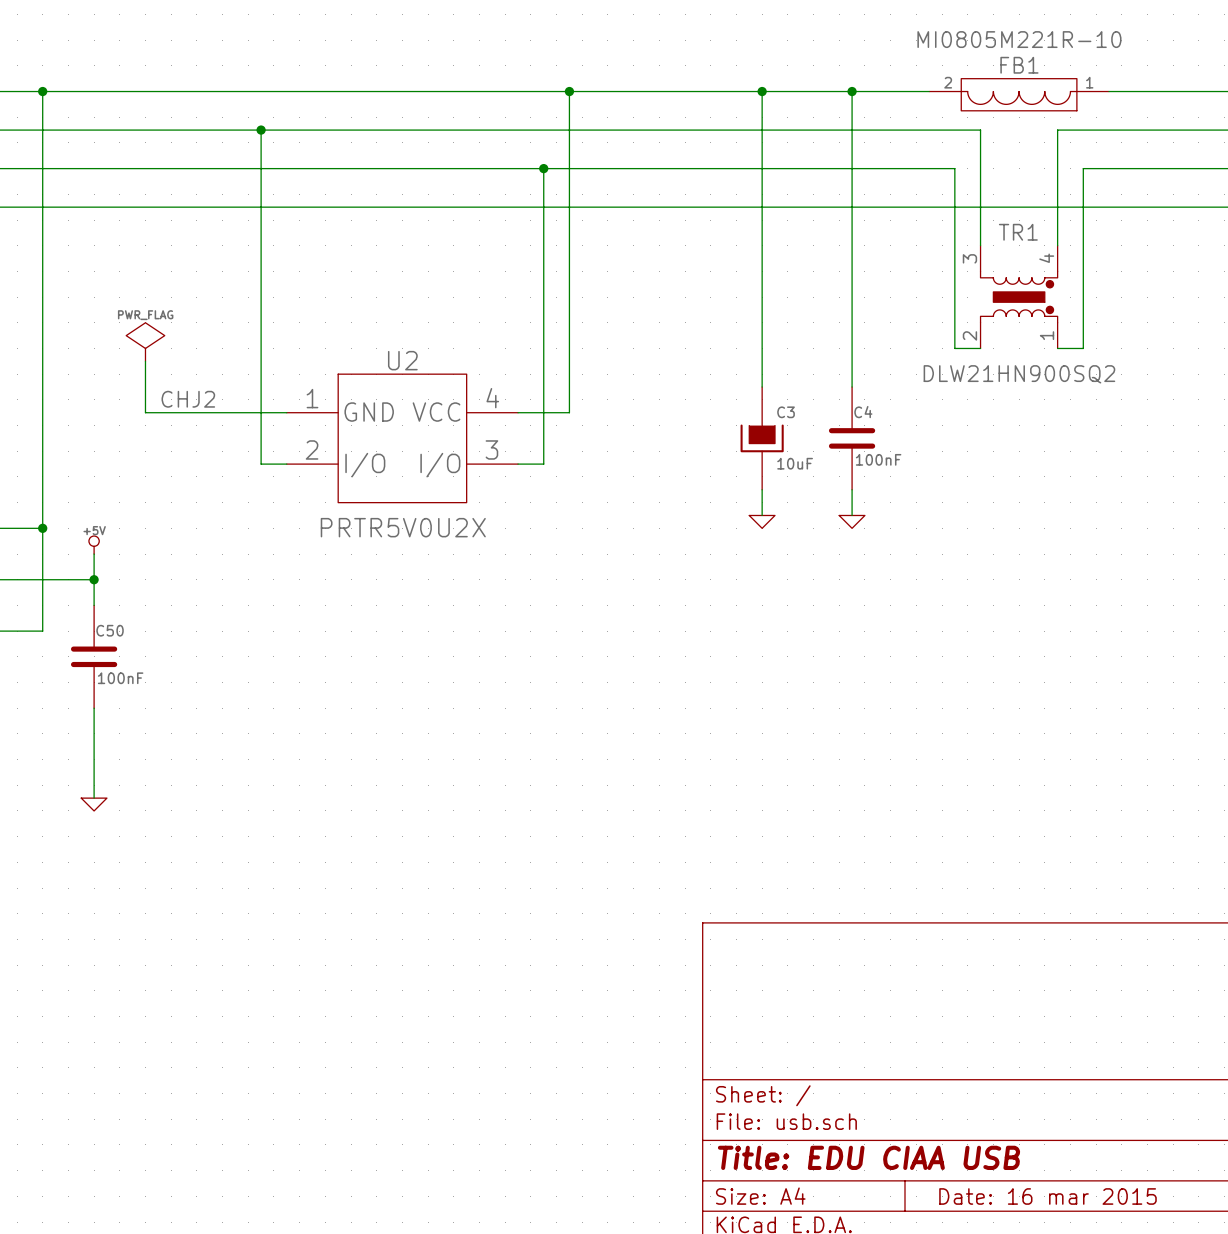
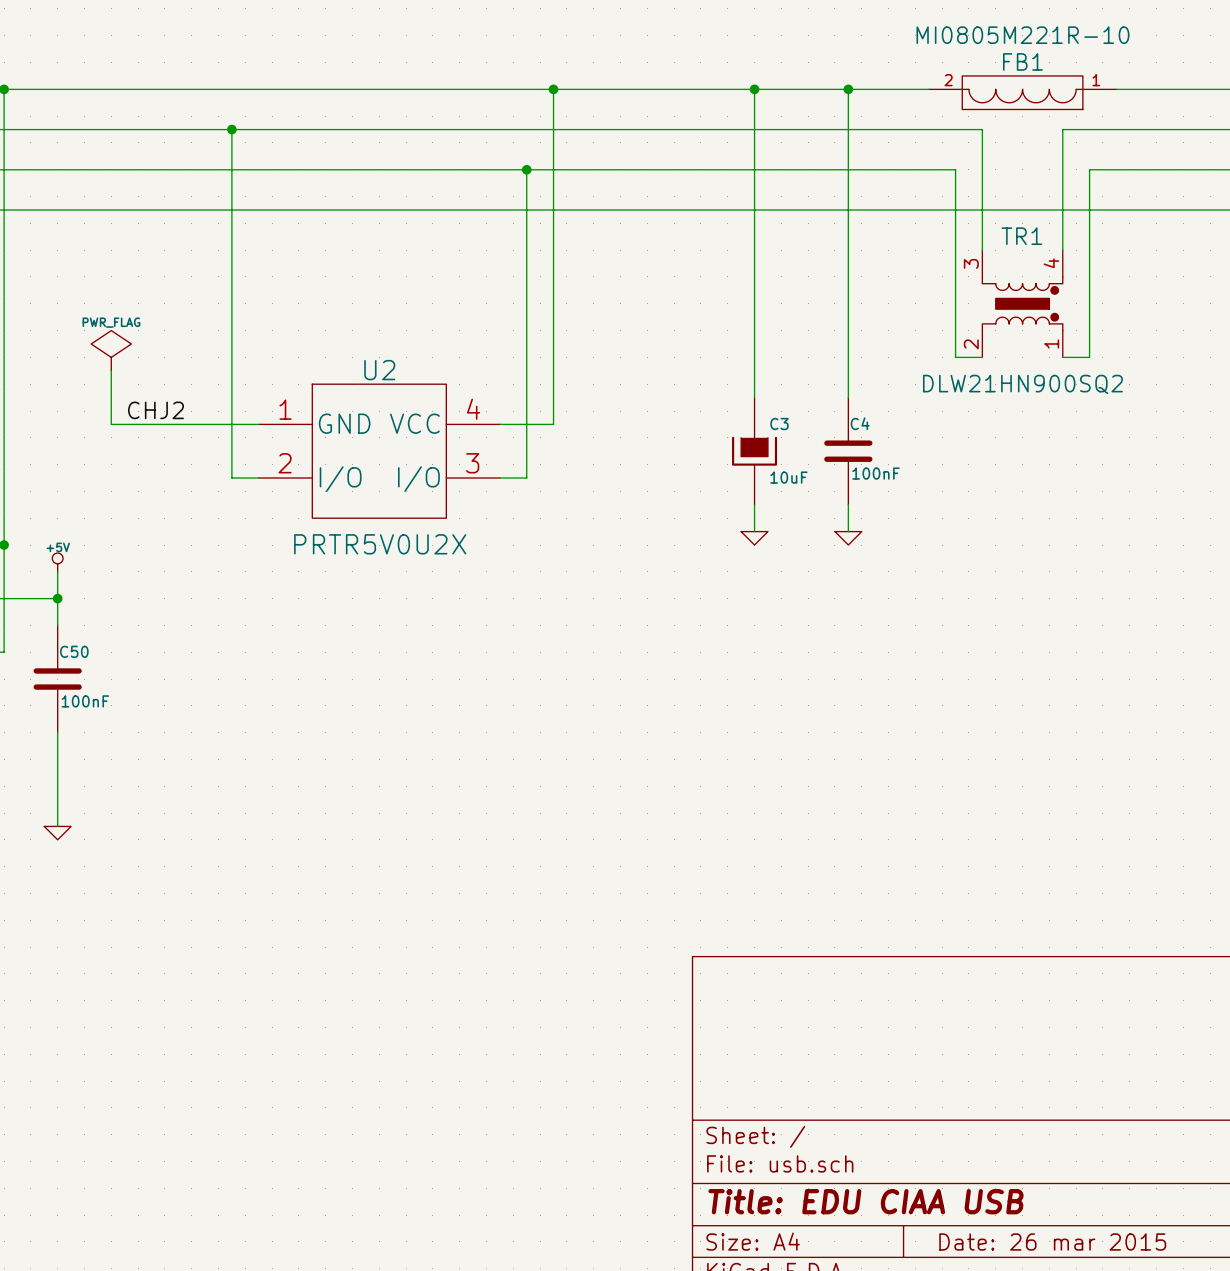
title block: Date: 16 mar 2015 (1047, 1196) -> Date: 26 mar 2015 (1052, 1241)

